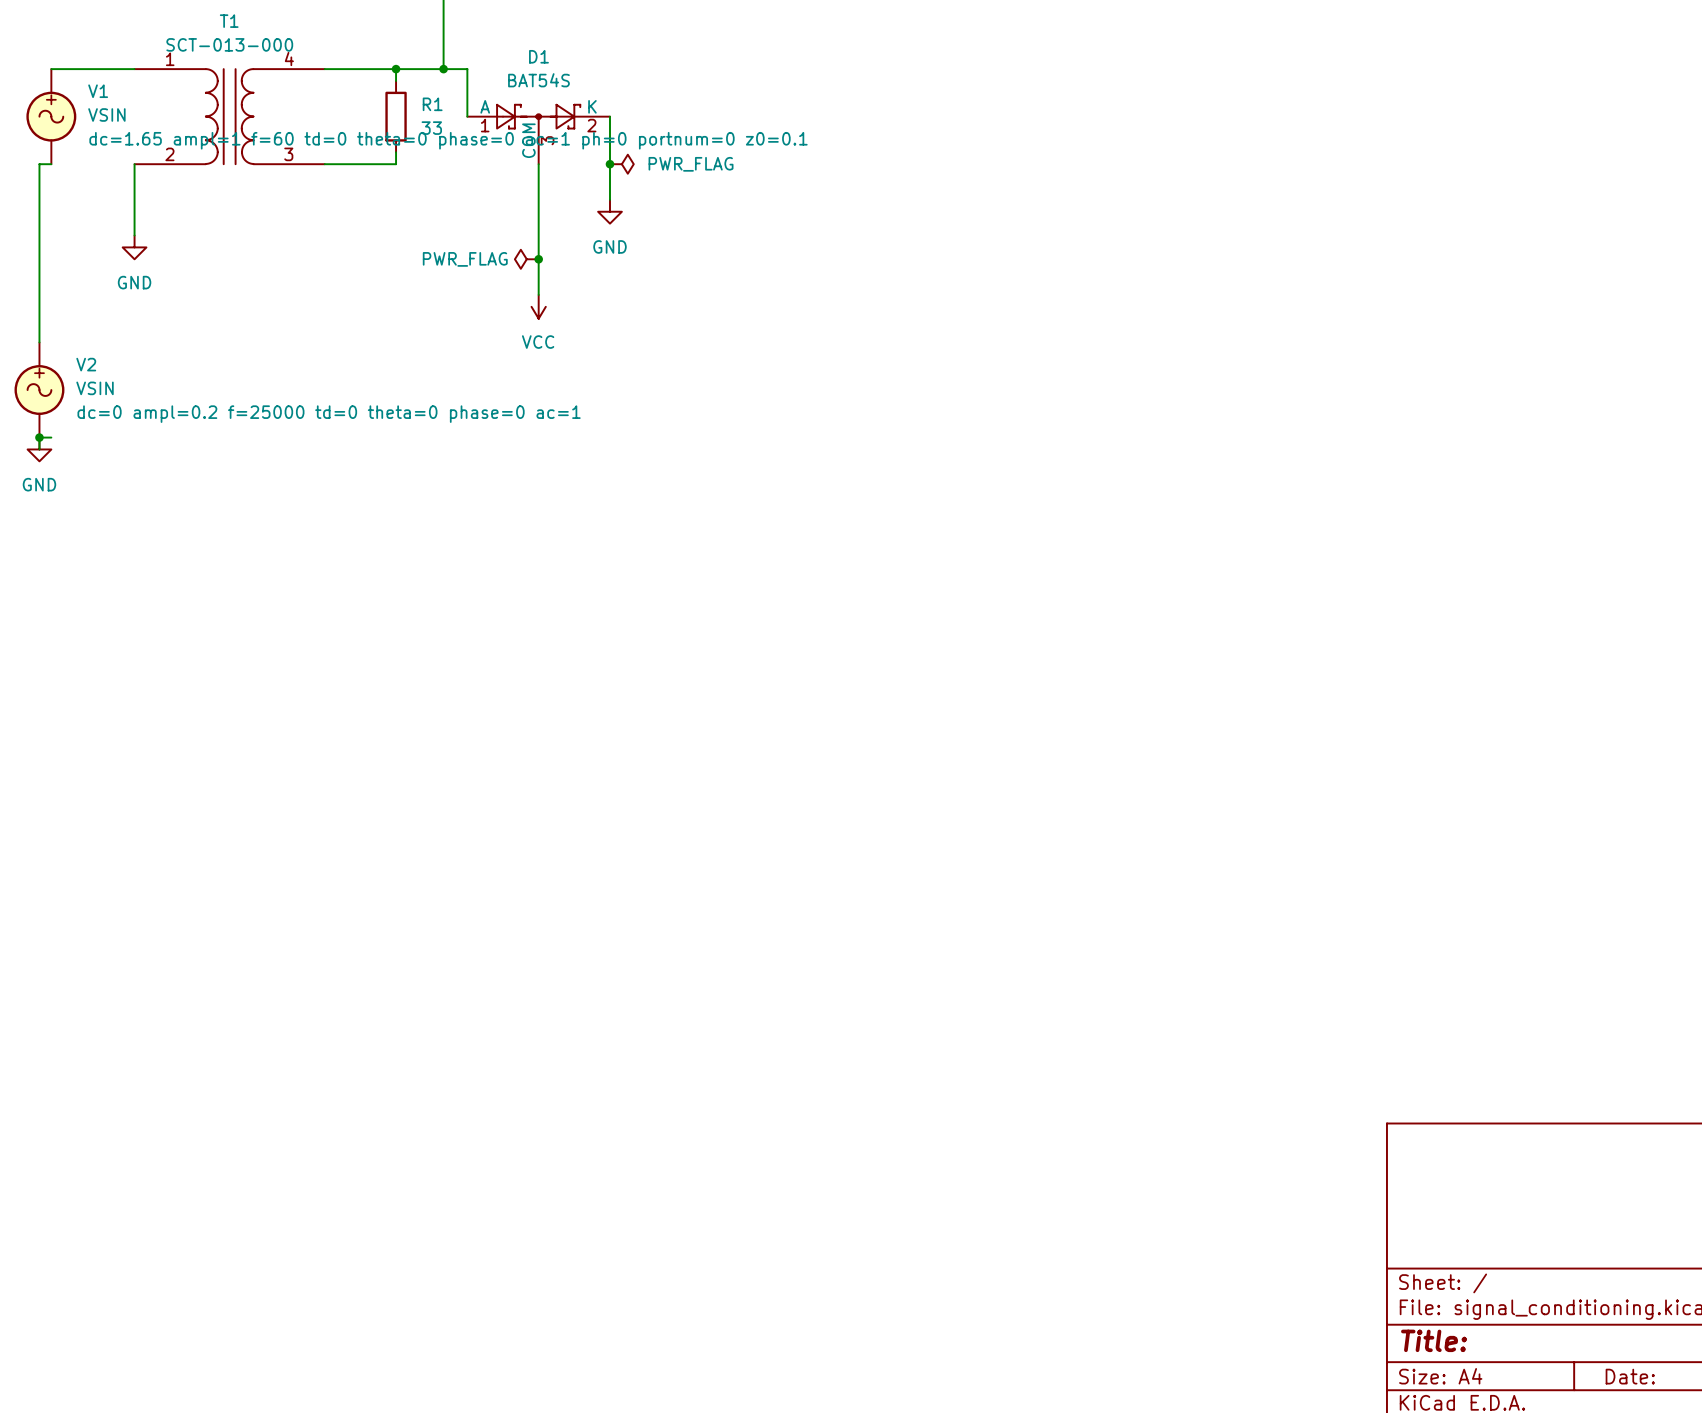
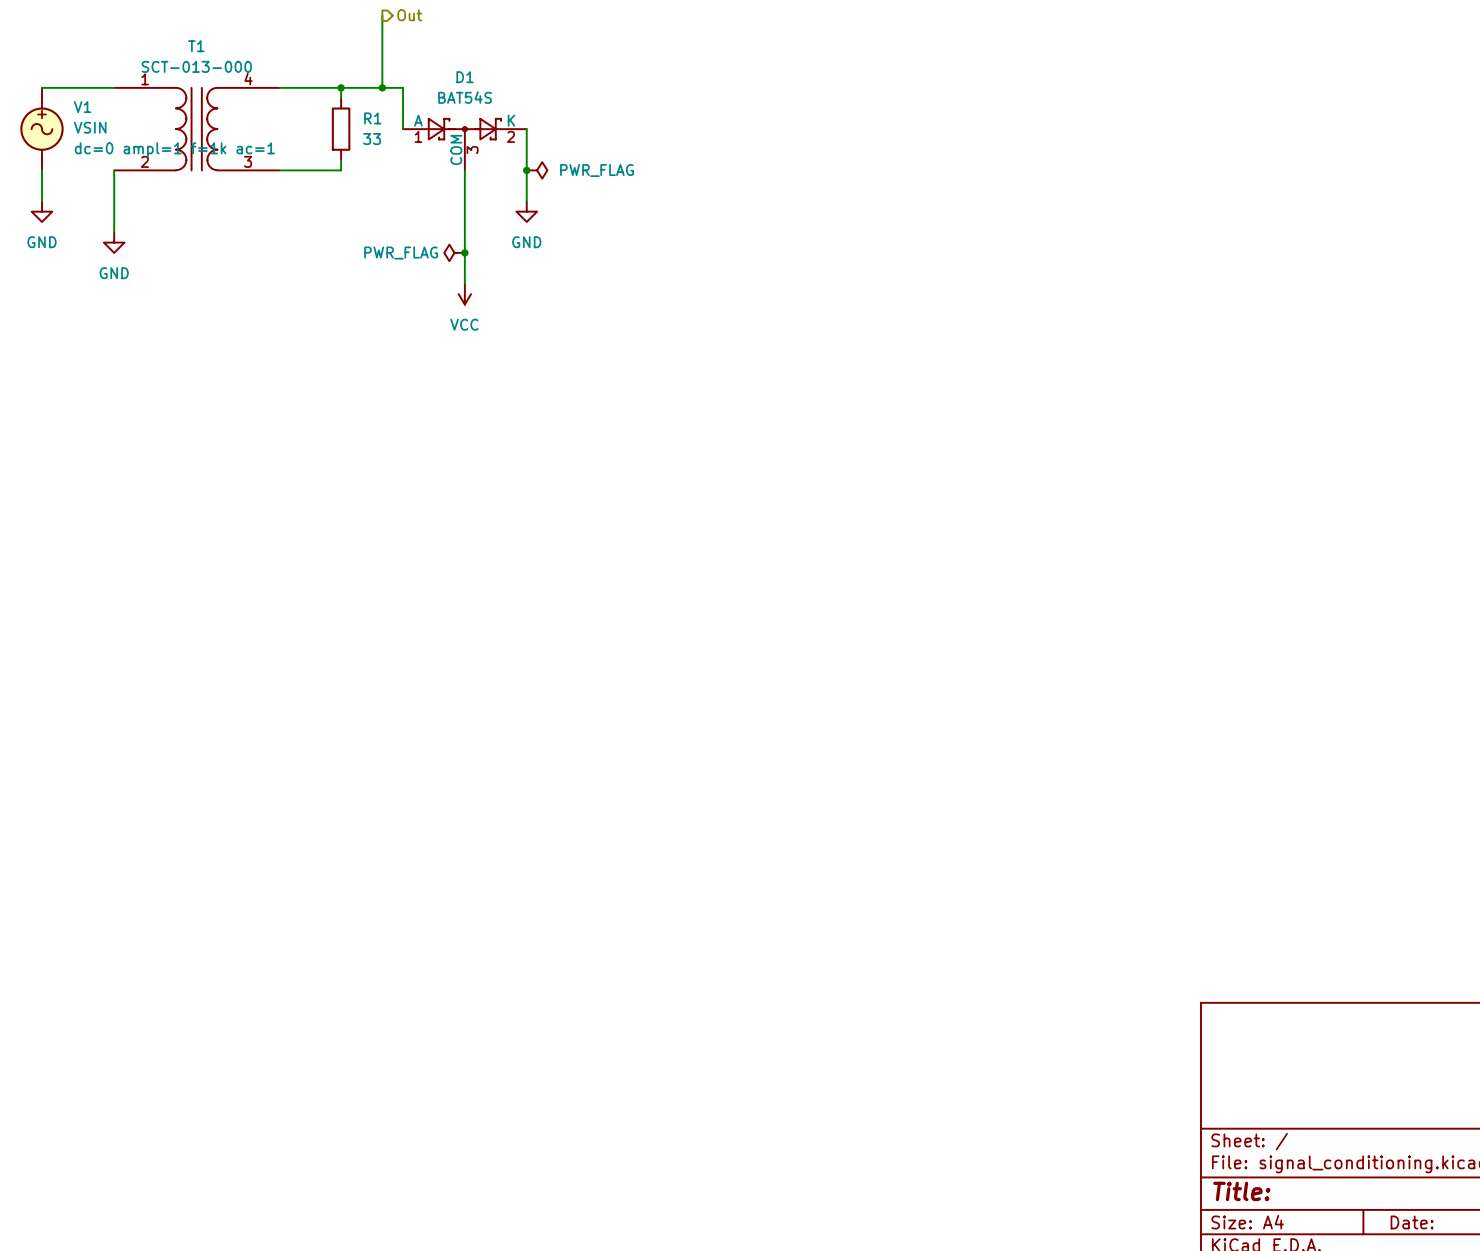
V1 text: dc=1.65 ampl=1 f=60 td=0 theta=0 phase=0 ac=1 ph=0 portnum=0 z0=0.1 (448, 140) -> dc=0 ampl=1 f=1k ac=1 (174, 150)
wire: (51, 164) (39, 164) (39, 342) -> (41, 170) (41, 201)
power symbol: none -> GND (41, 211)
V2: VSIN (39, 390) -> none
junction: (39, 437) -> none
wire: (51, 437) (39, 437) (39, 449) -> none
power symbol: GND (39, 449) -> none

